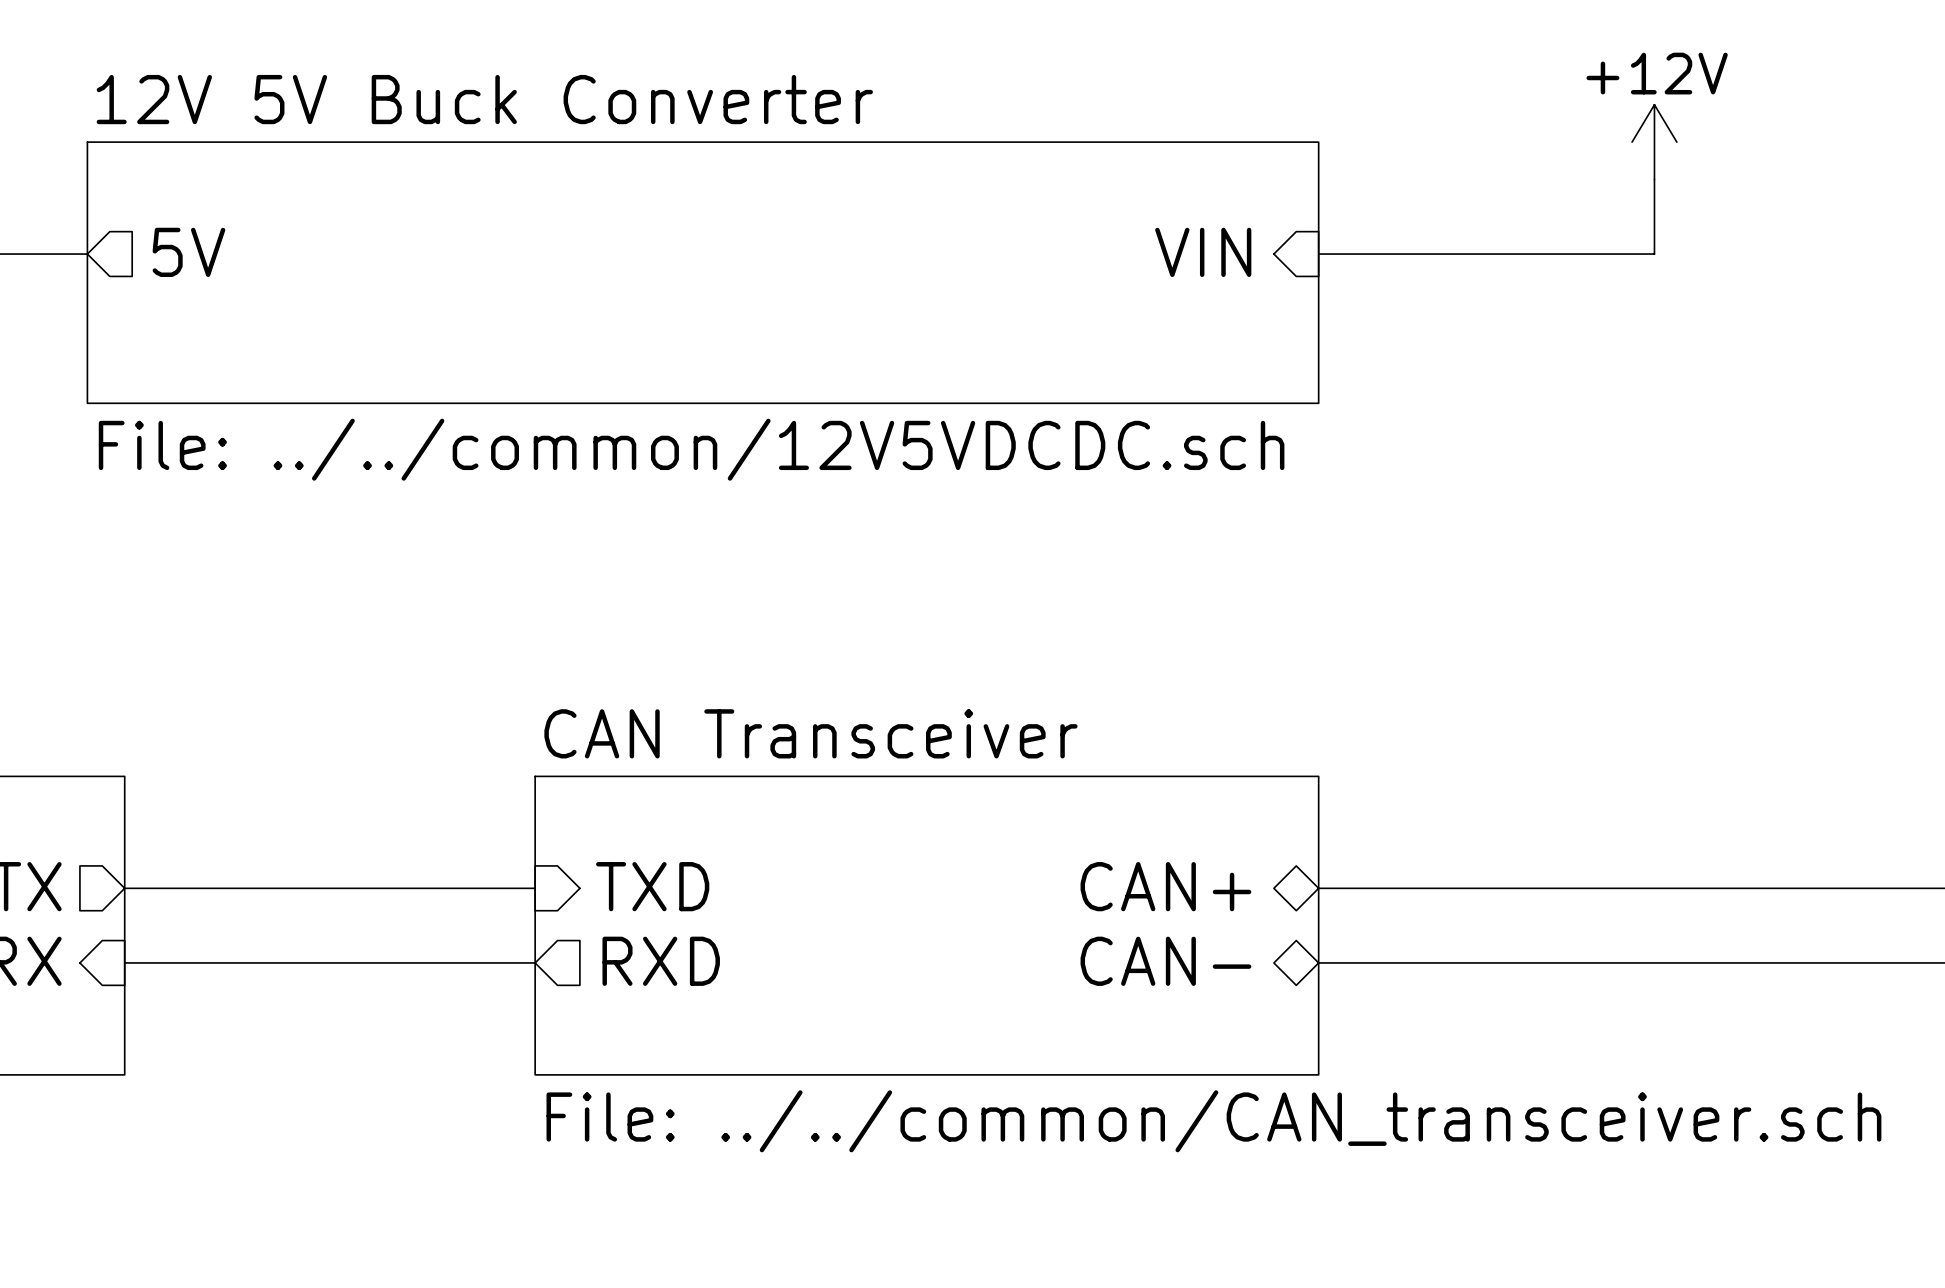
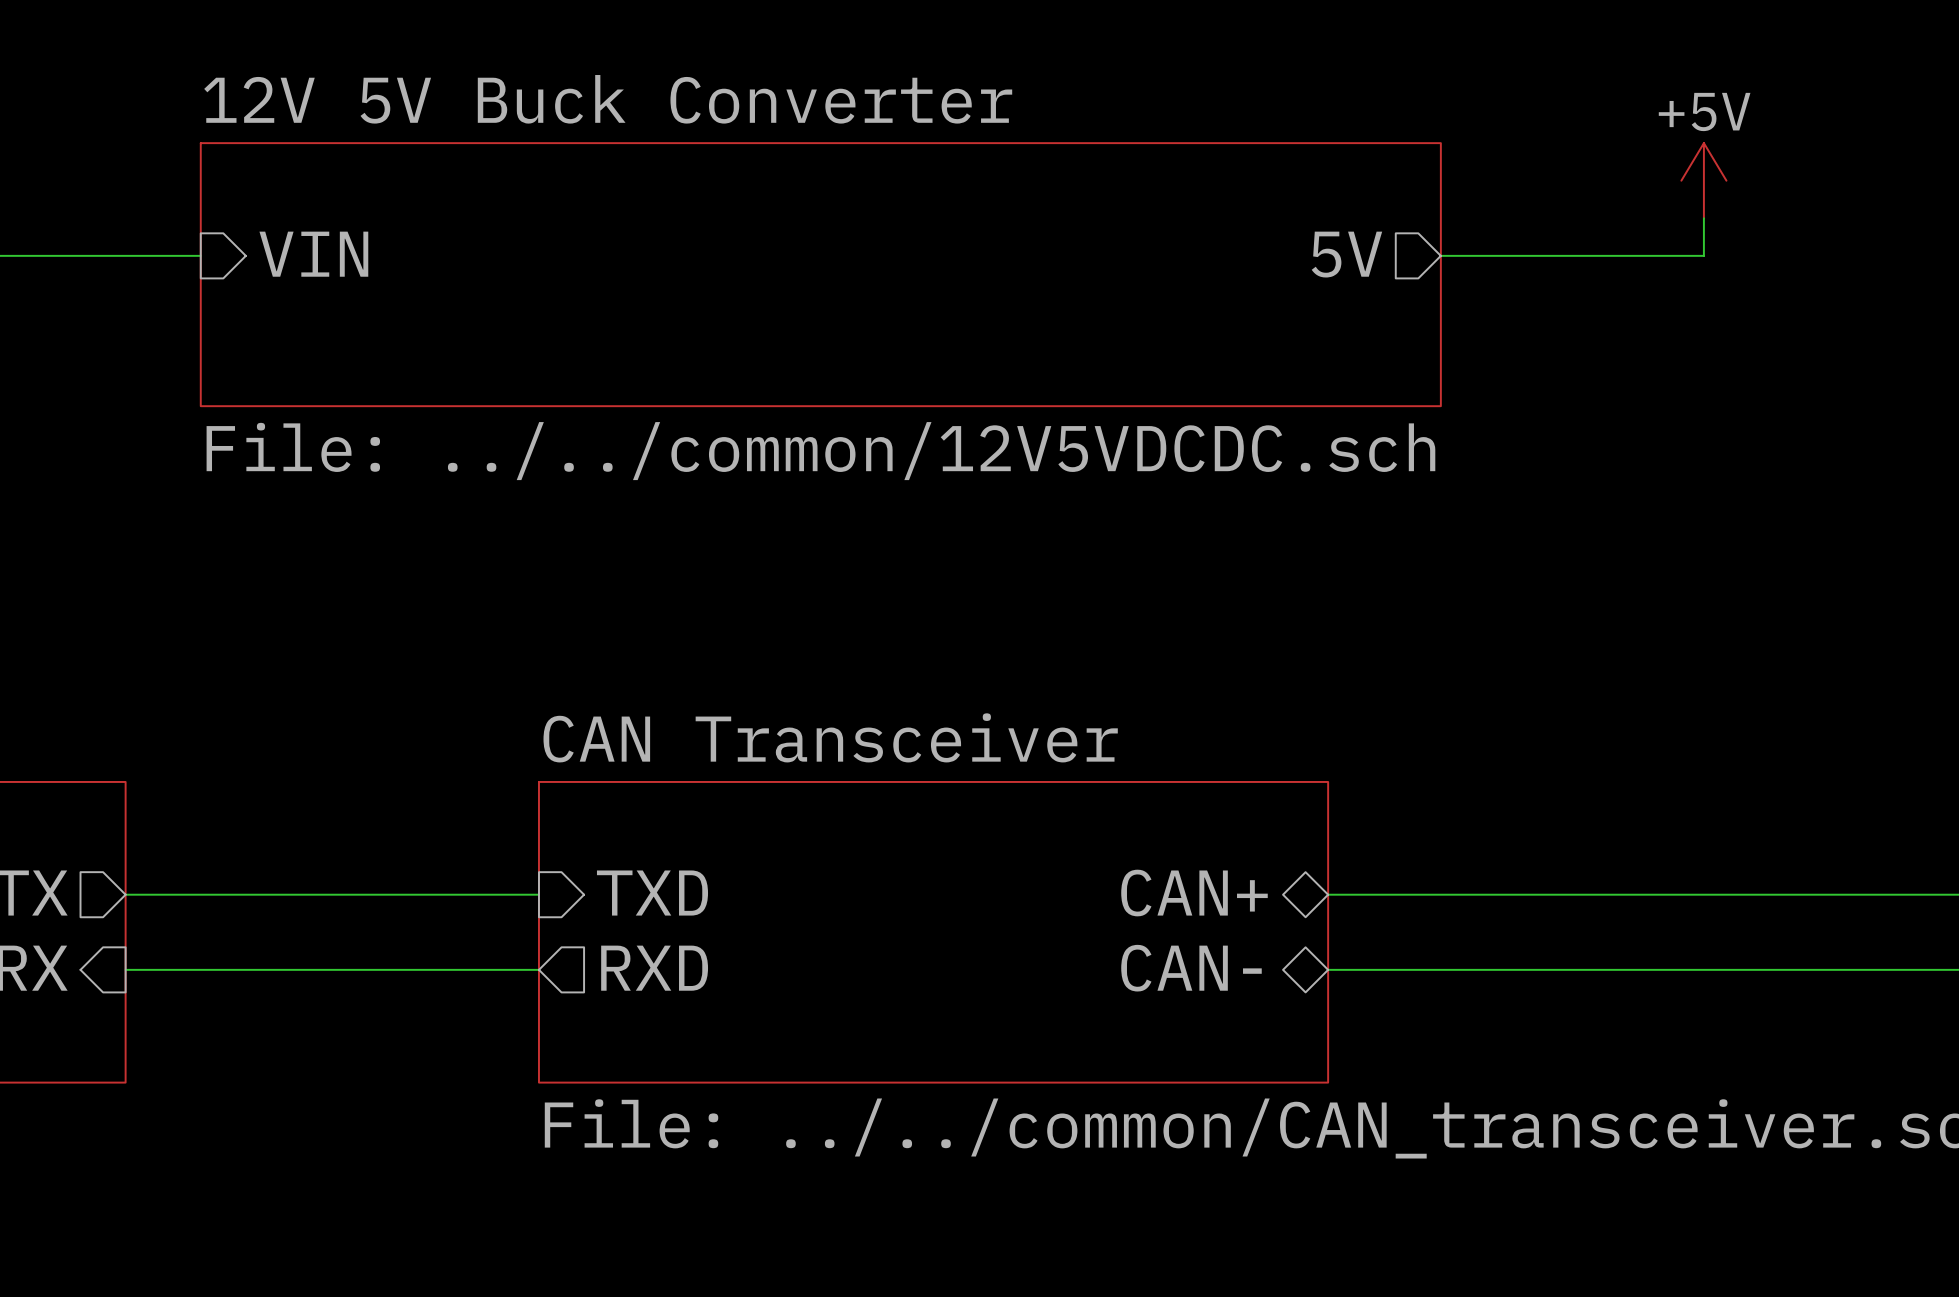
power symbol: +12V (1654, 142) -> none
wire: (1654, 179) (1654, 254) -> (1703, 218) (1703, 255) (1666, 255)
power symbol: none -> +5V (1703, 180)
sheet pin: 5V (188, 252) -> none
sheet pin: none -> VIN (313, 254)
sheet pin: VIN (1203, 252) -> none
sheet pin: none -> 5V (1346, 254)
wire: none -> (88, 255) (200, 255)
wire: (1318, 254) (1430, 254) -> none
sheet 12V 5V Buck Converter position: (703, 272) -> (820, 274)

